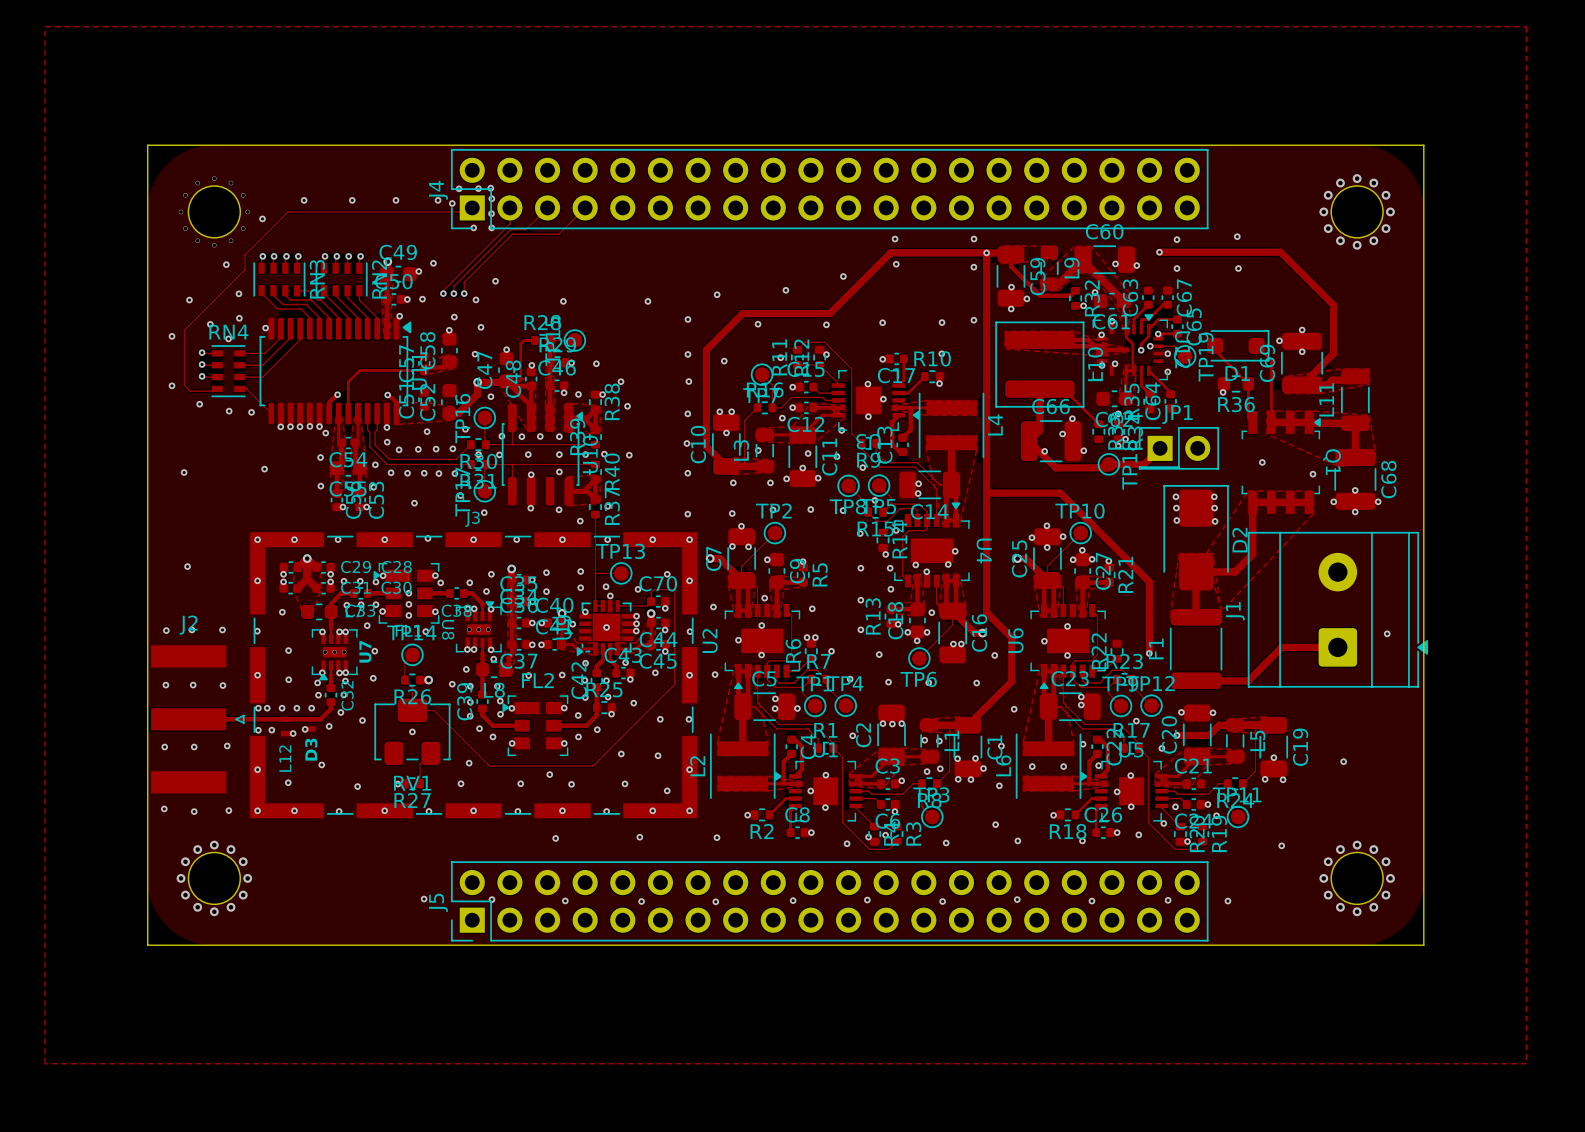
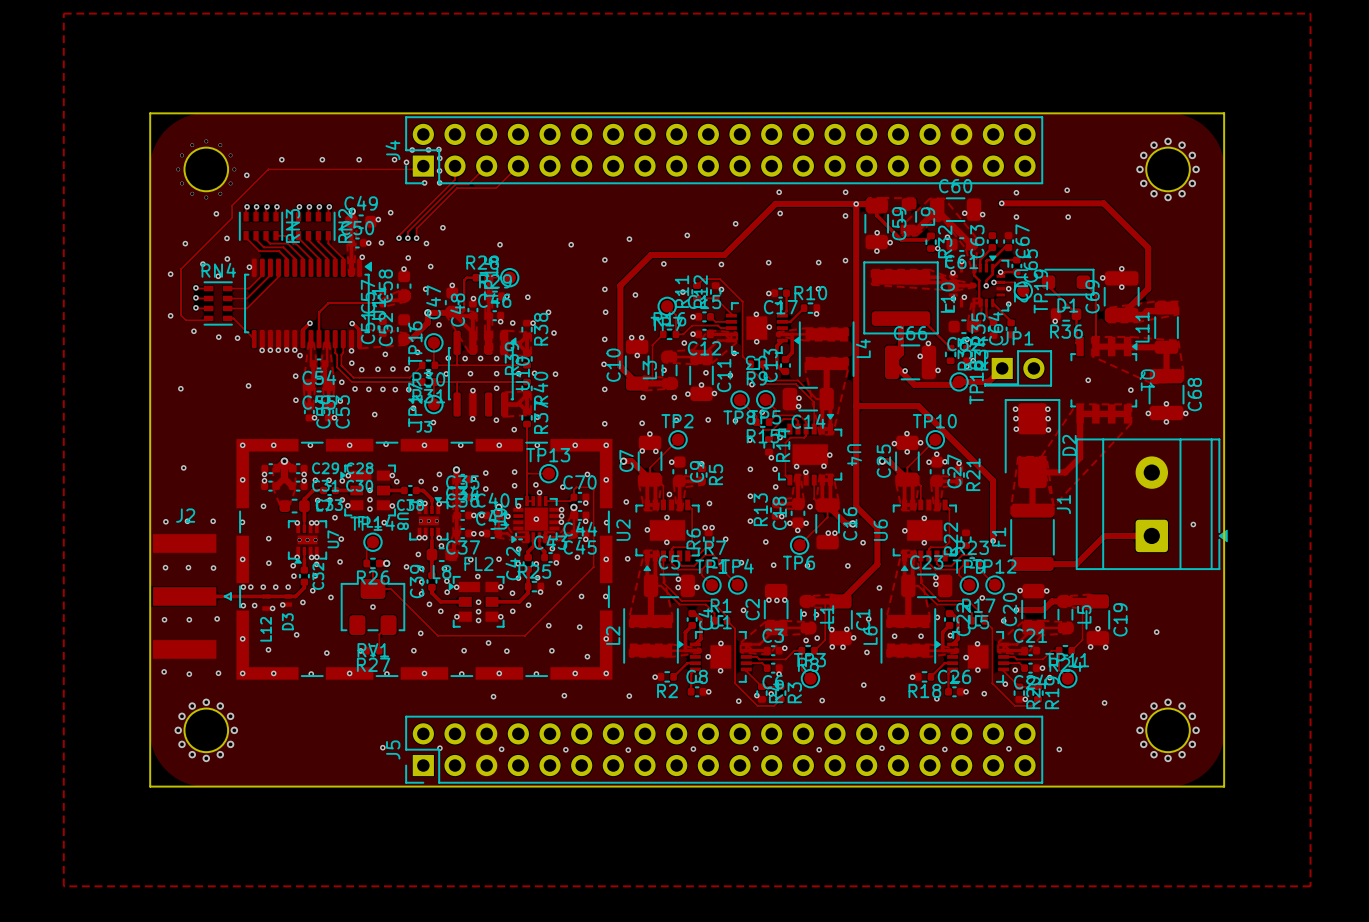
via: none -> (477, 576)
via: none -> (478, 602)
via: none -> (478, 611)
via: none -> (478, 620)

